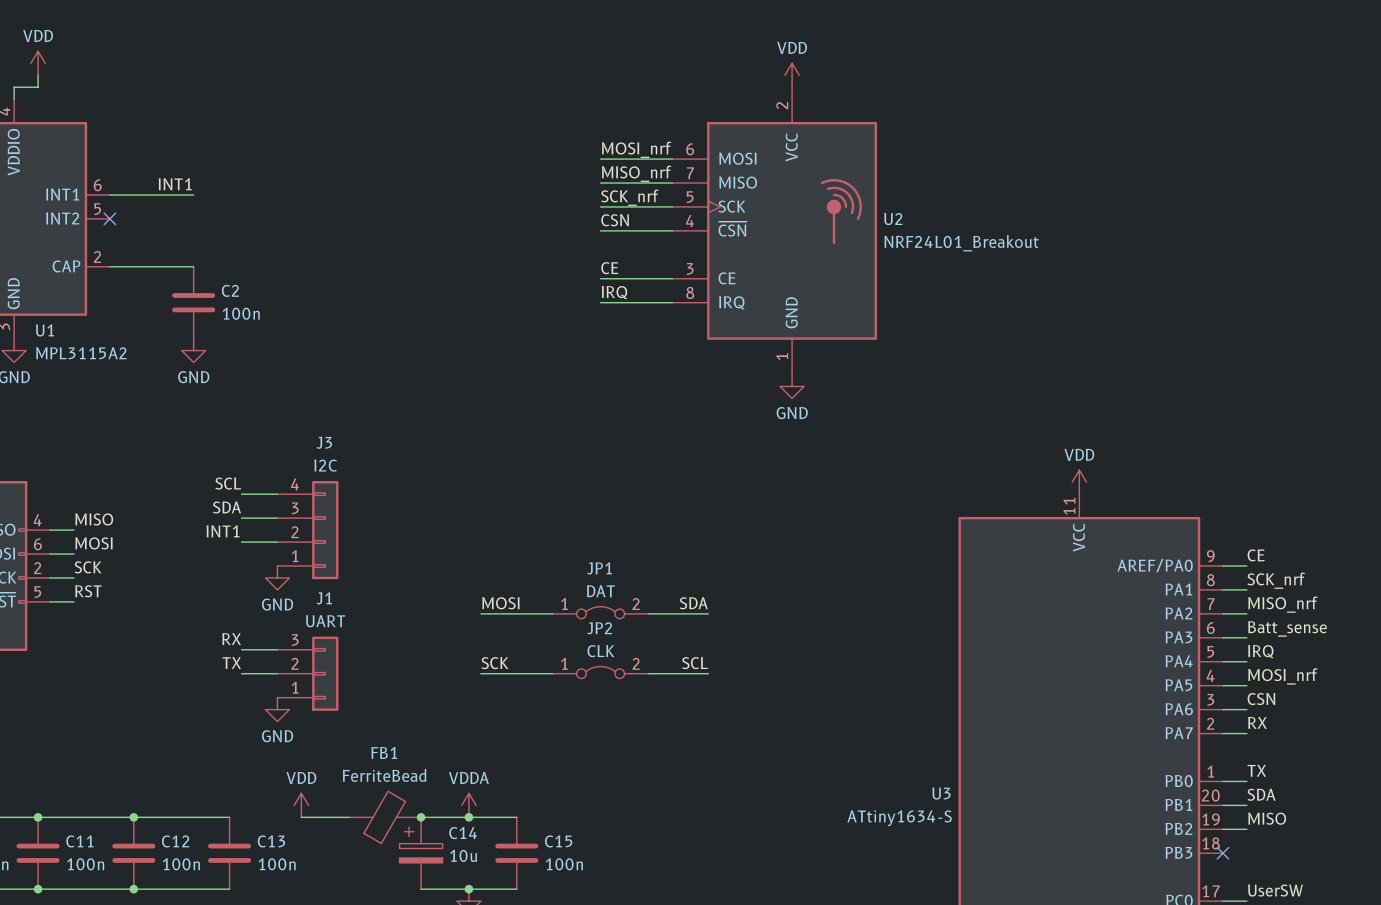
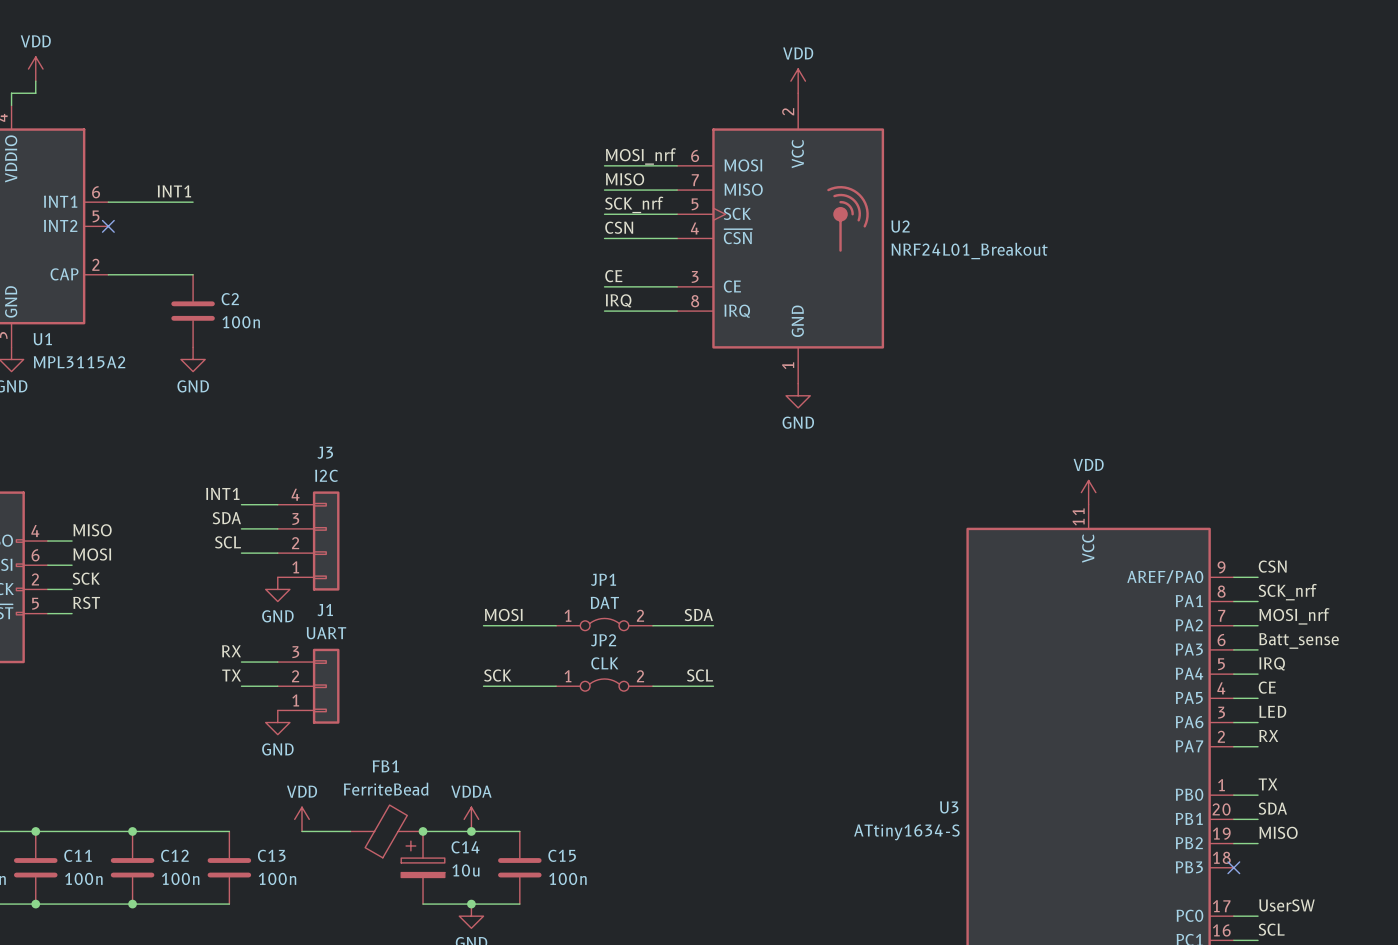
label: MISO_nrf (636, 173) -> MISO (625, 179)
label: SCL (228, 483) -> INT1 (222, 493)
label: INT1 (223, 531) -> SCL (228, 542)
label: CE (1256, 555) -> CSN (1272, 566)
label: MISO_nrf (1282, 604) -> MOSI_nrf (1294, 616)
label: MOSI_nrf (1282, 676) -> CE (1267, 687)
label: CSN (1261, 699) -> LED (1272, 711)

